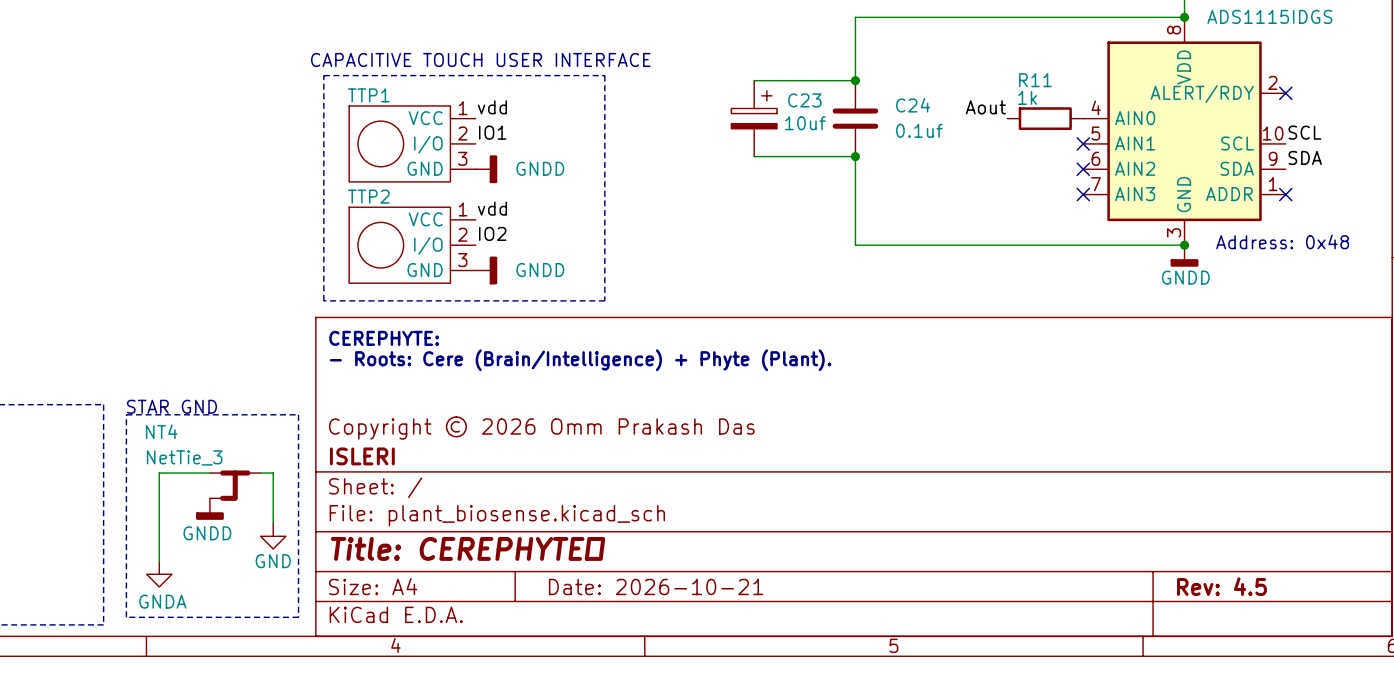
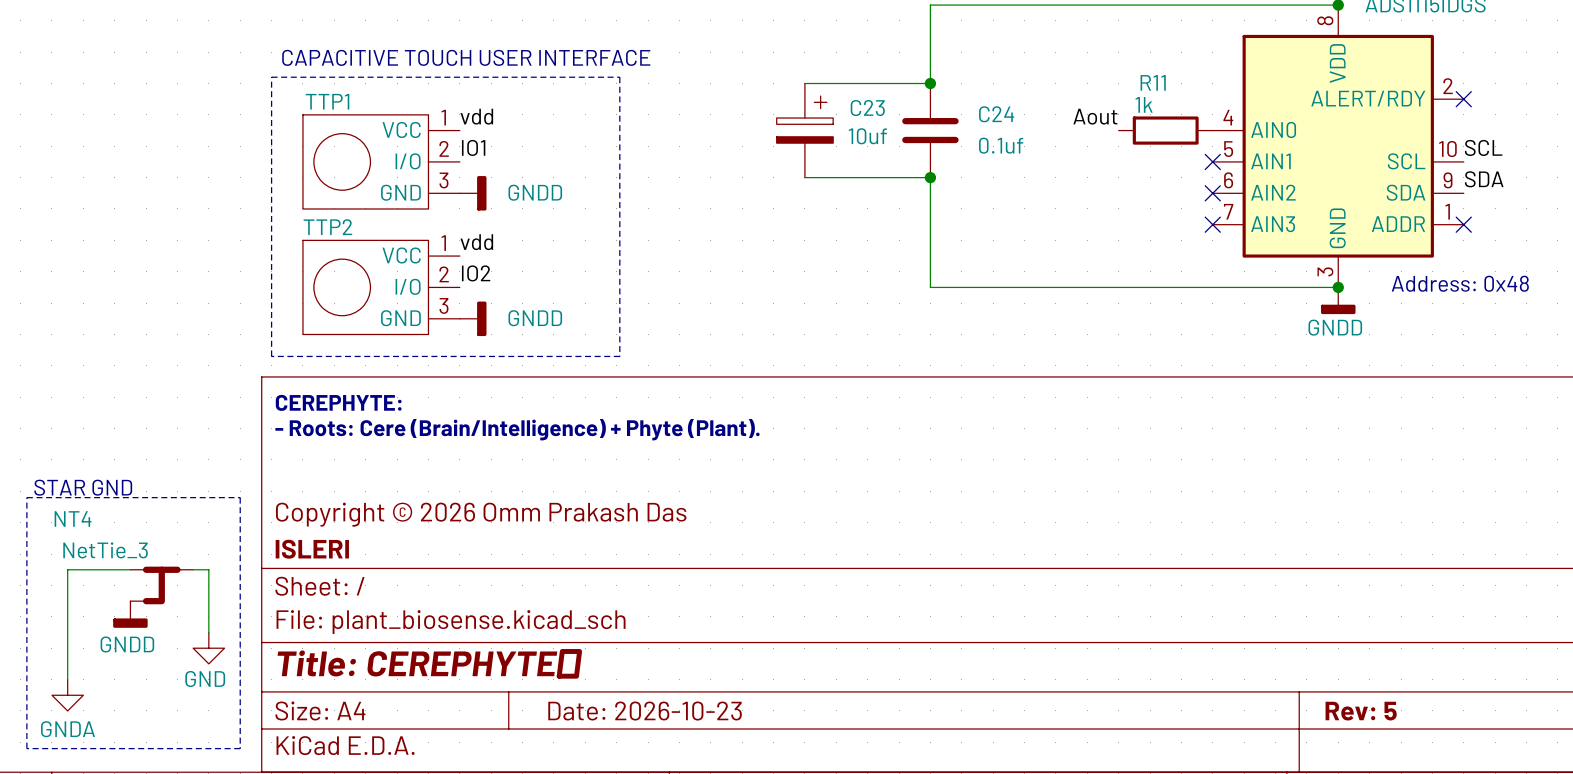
title block: Date: 2026-10-21 (656, 586) -> Date: 2026-10-23 (645, 711)
title block: Rev: 4.5 (1221, 586) -> Rev: 5 (1361, 711)

